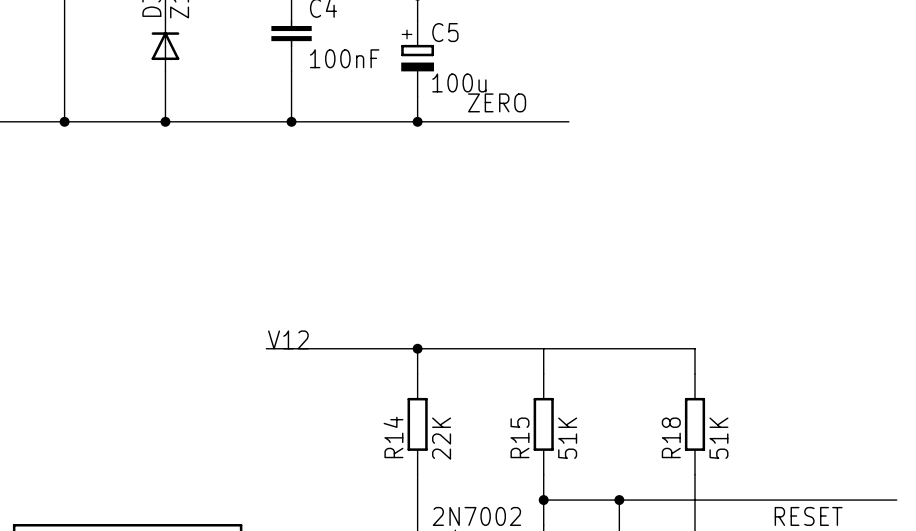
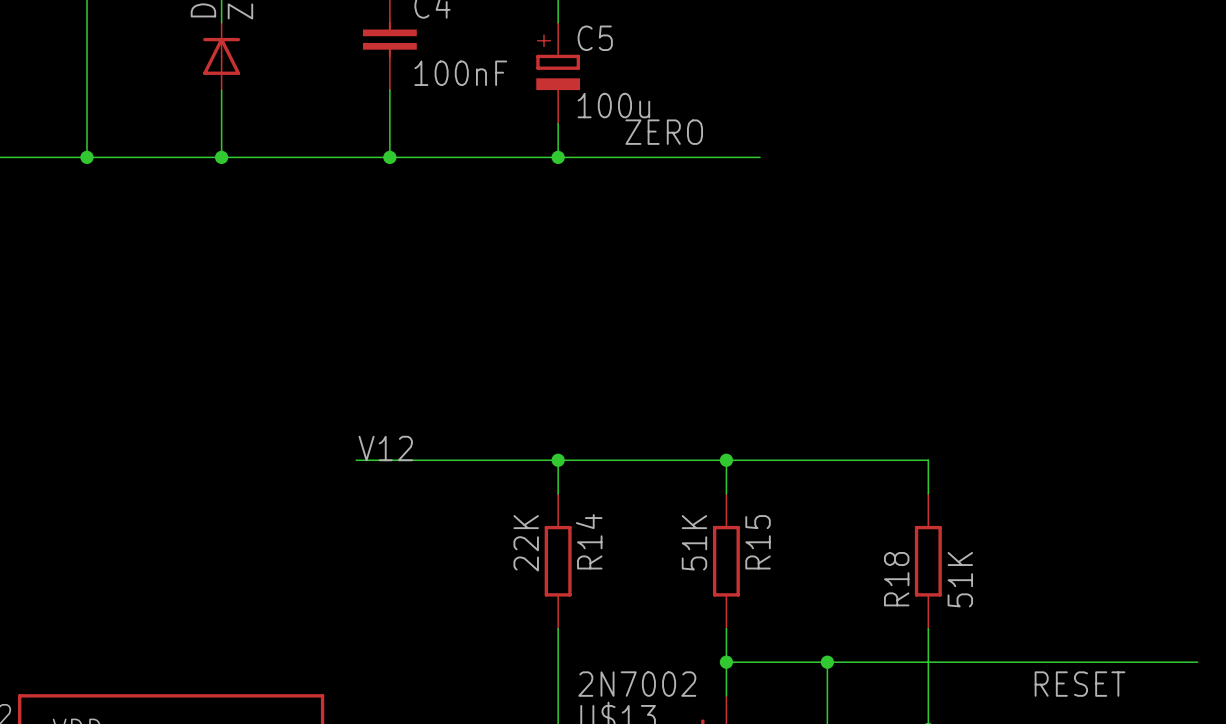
junction: none -> (726, 460)
R14 name position: R14 (393, 437) -> R14 (589, 541)
R15 name position: R15 (519, 437) -> R15 (758, 542)
R14 value position: 22K (441, 438) -> 22K (526, 543)
R15 value position: 51K (567, 438) -> 51K (694, 542)

